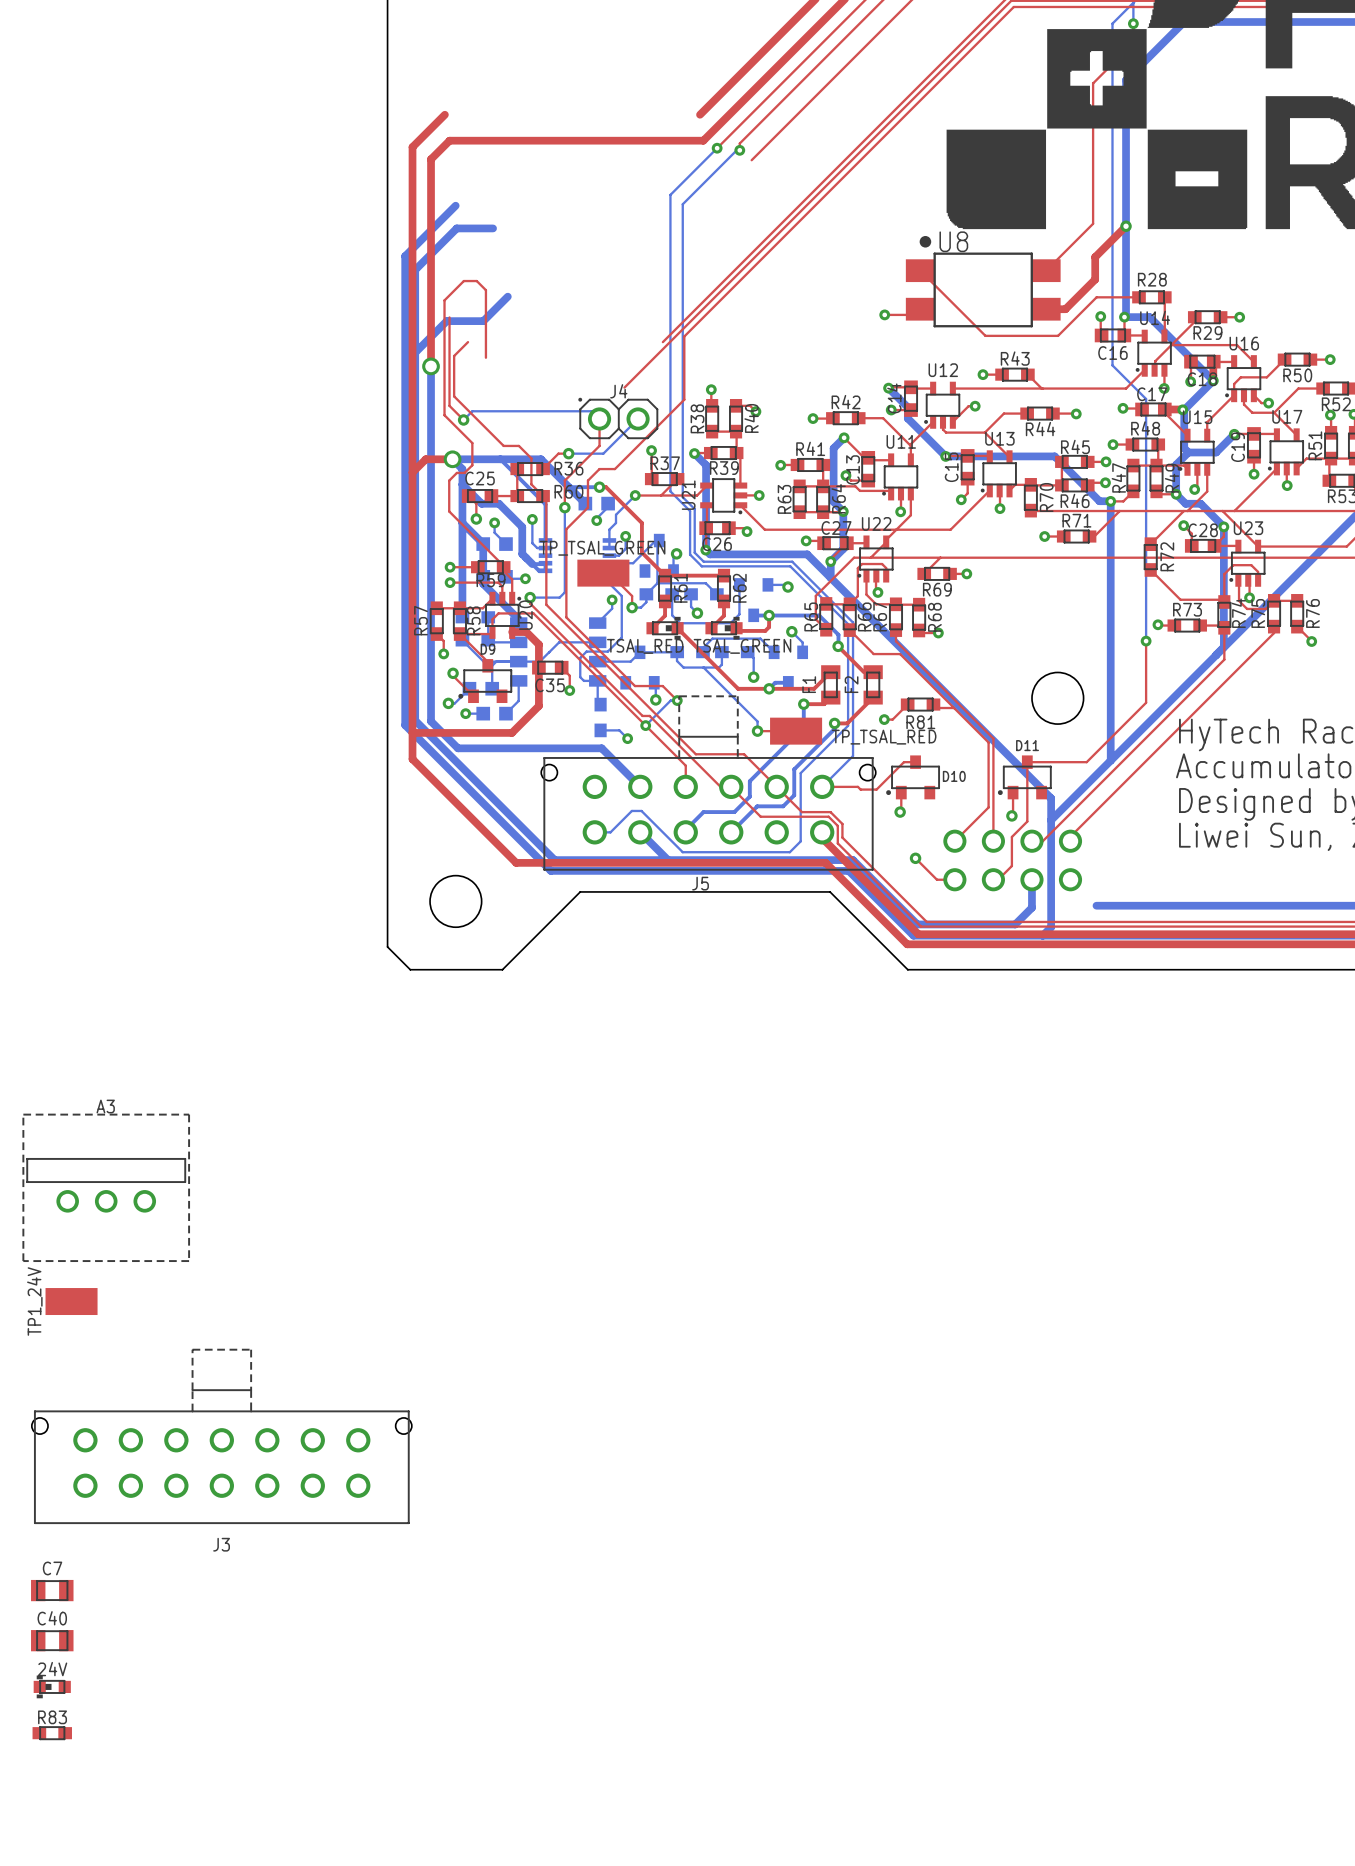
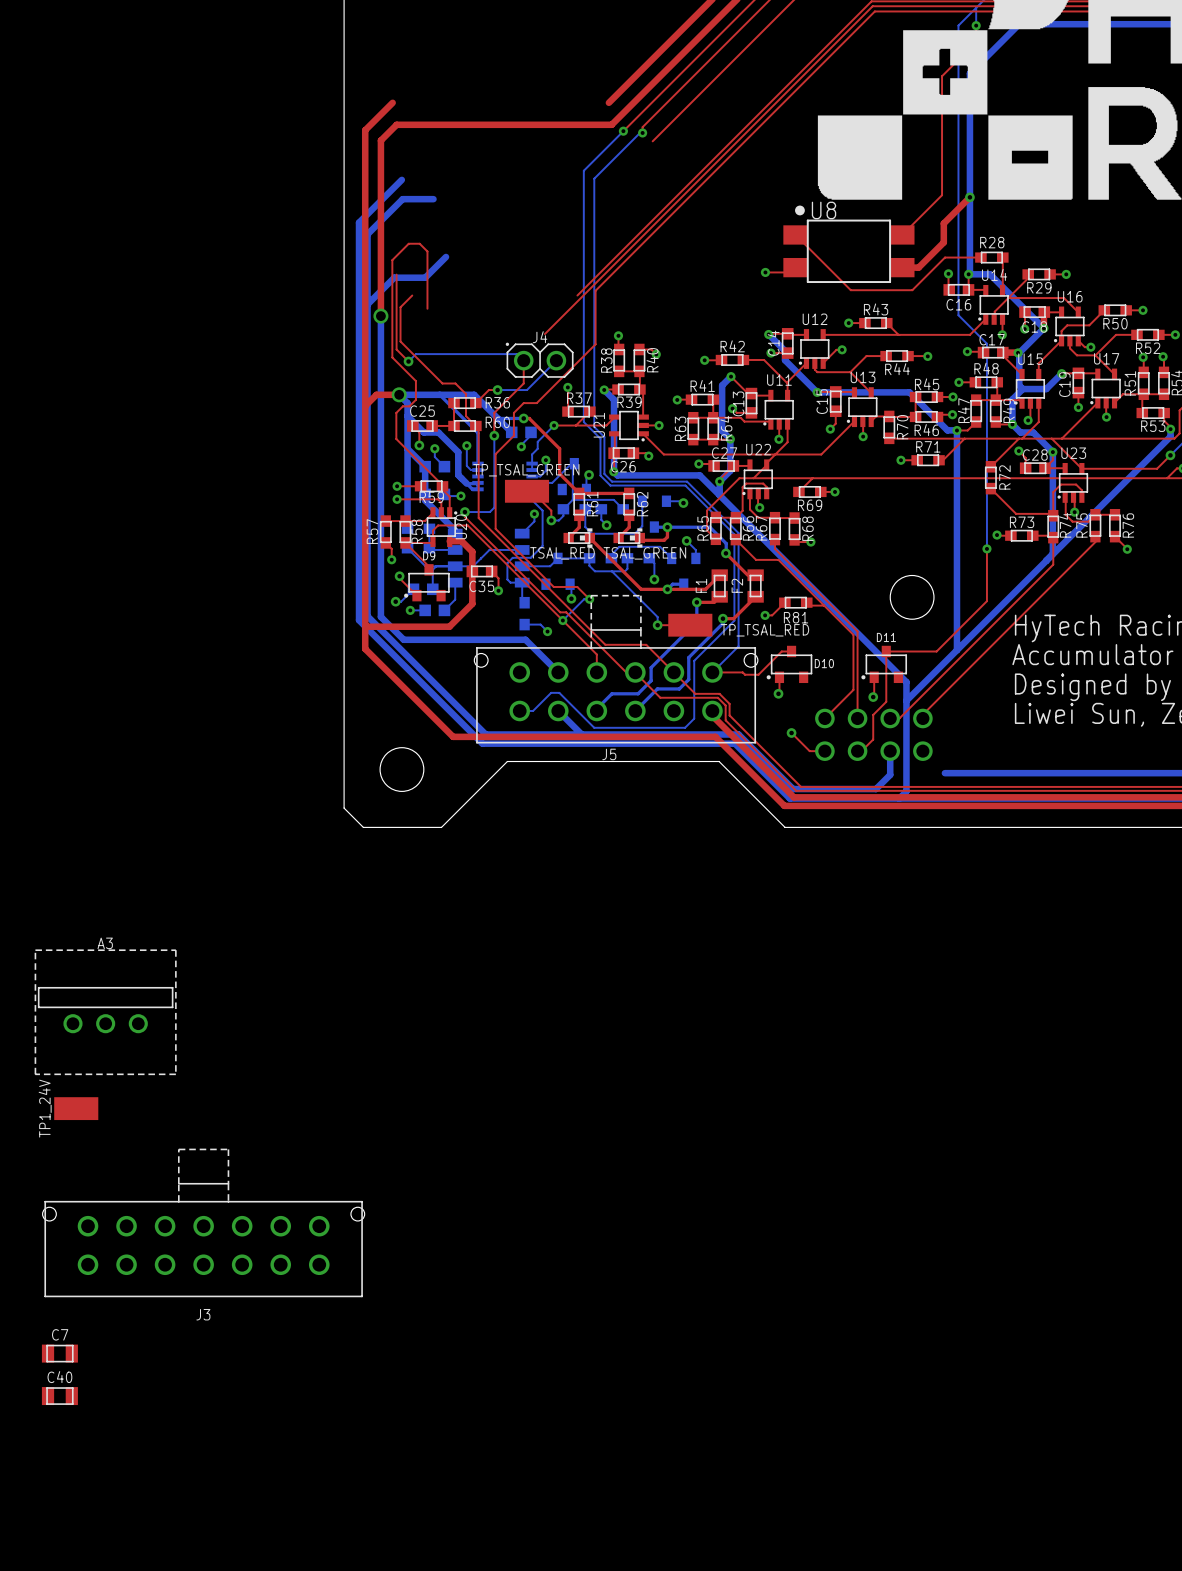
24V: (52, 1686) -> none
R83: (52, 1733) -> none

